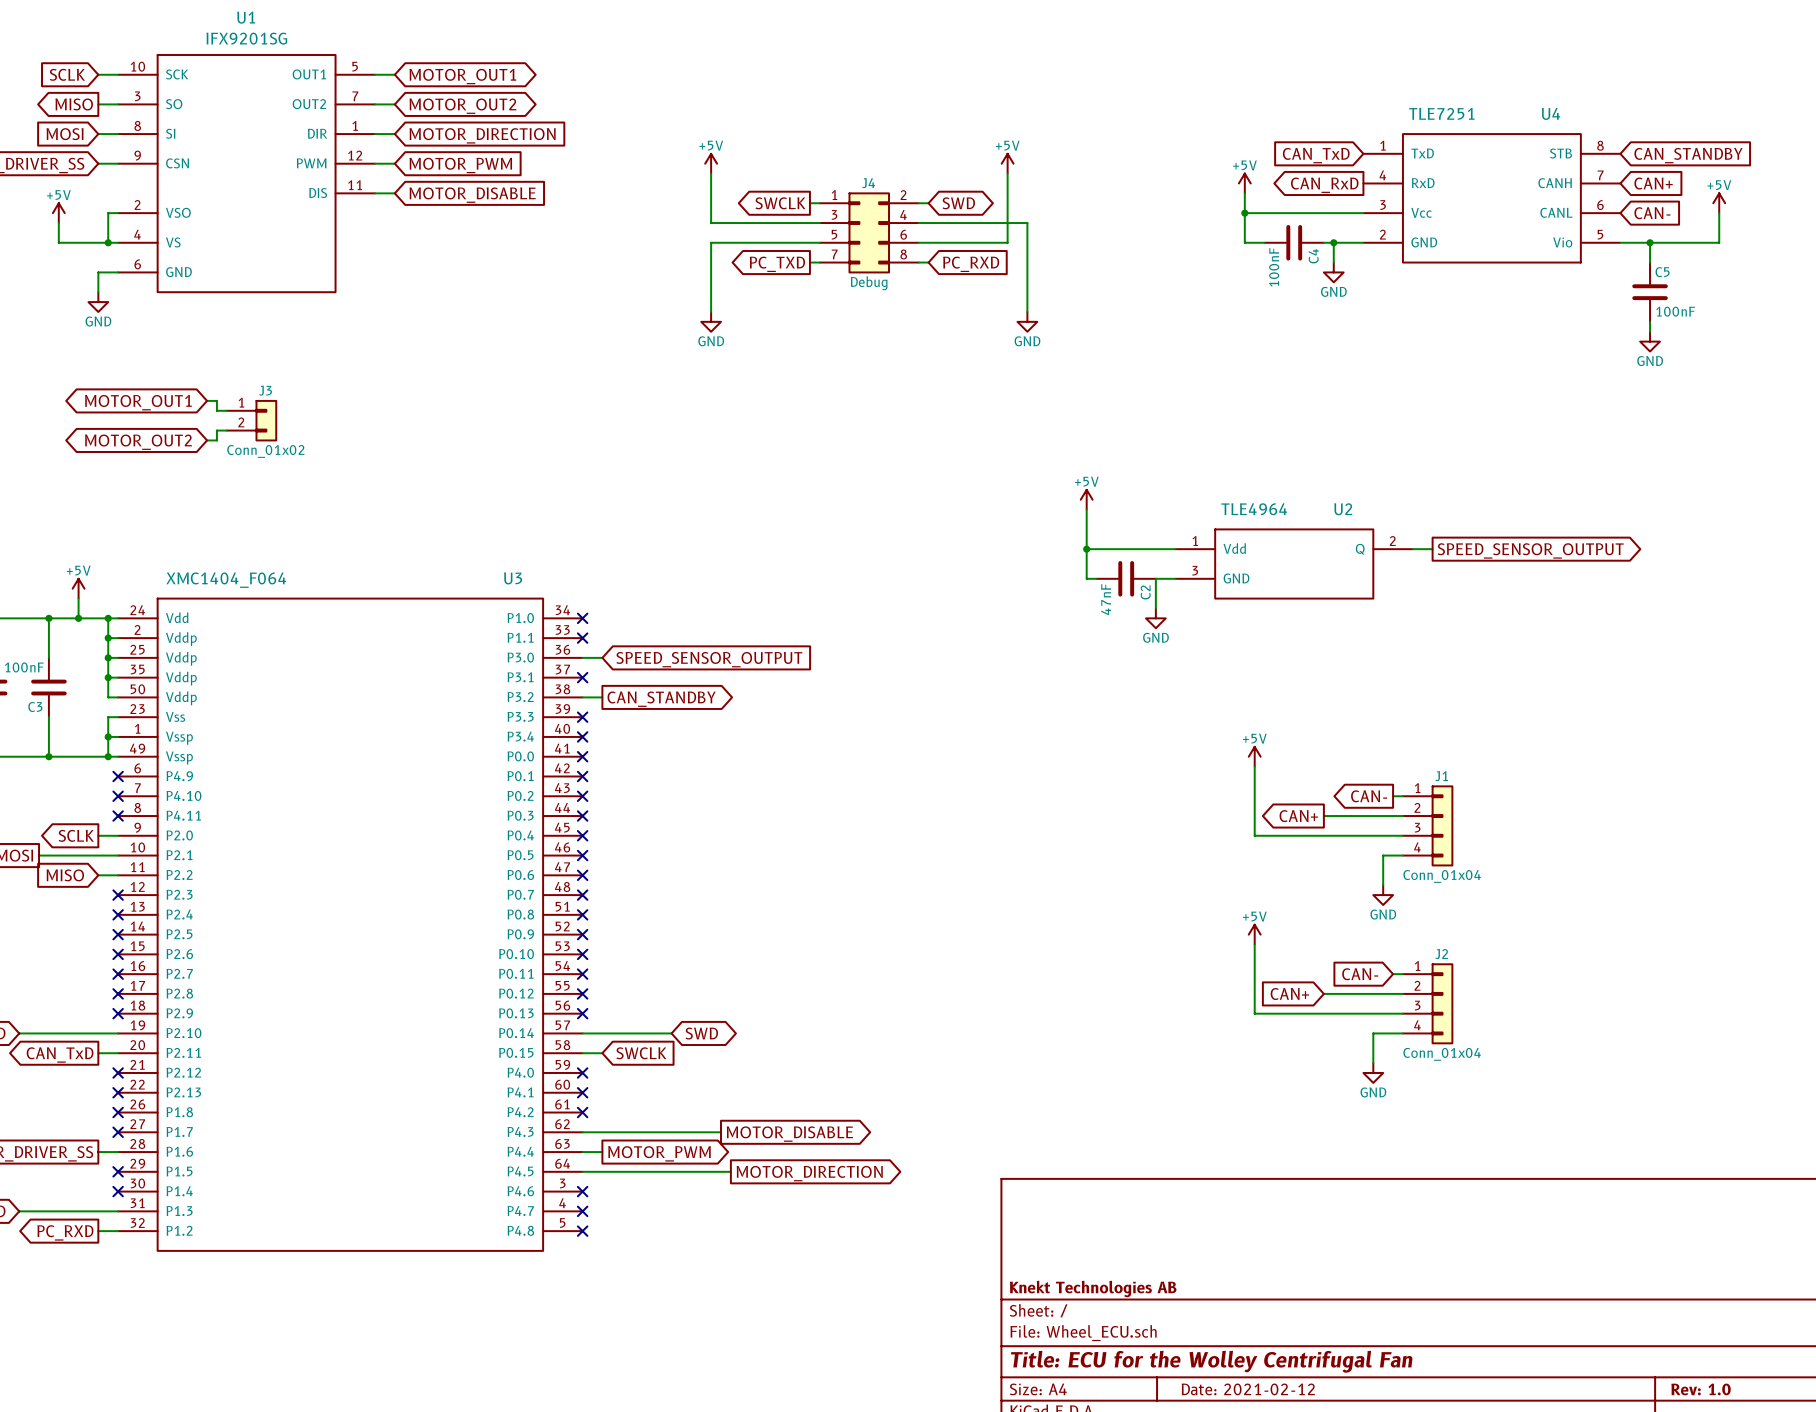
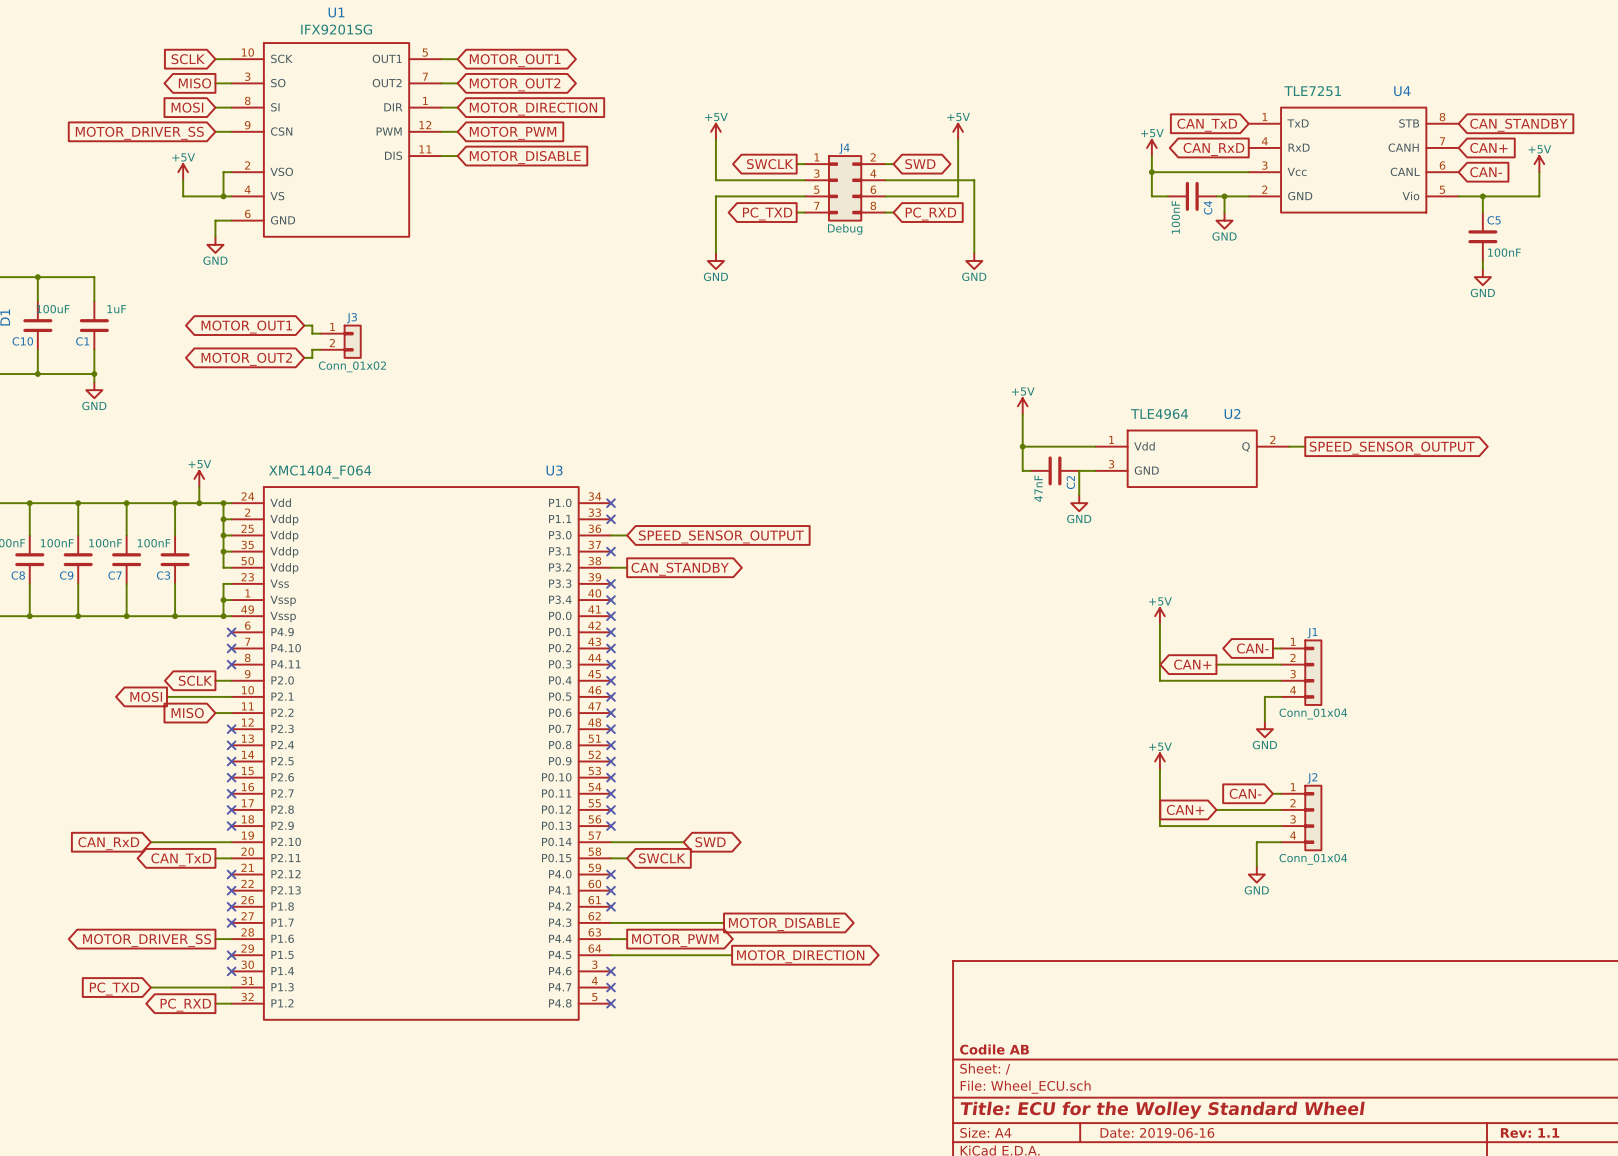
title block: Knekt Technologies AB (1093, 1288) -> Codile AB (994, 1049)
title block: Title: ECU for the Wolley Centrifugal Fan (1211, 1361) -> Title: ECU for the Wolley Standard Wheel (1162, 1110)
title block: Date: 2021-02-12 (1248, 1389) -> Date: 2019-06-16 (1157, 1132)
title block: Rev: 1.0 (1701, 1389) -> Rev: 1.1 (1530, 1133)

